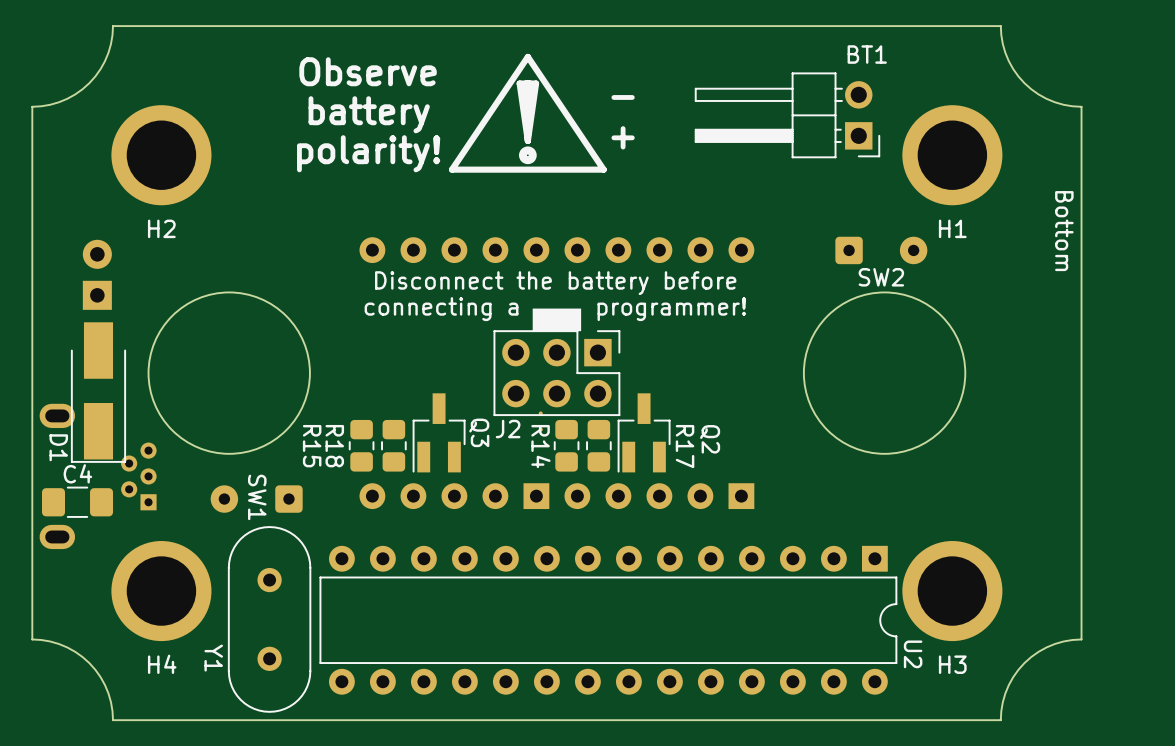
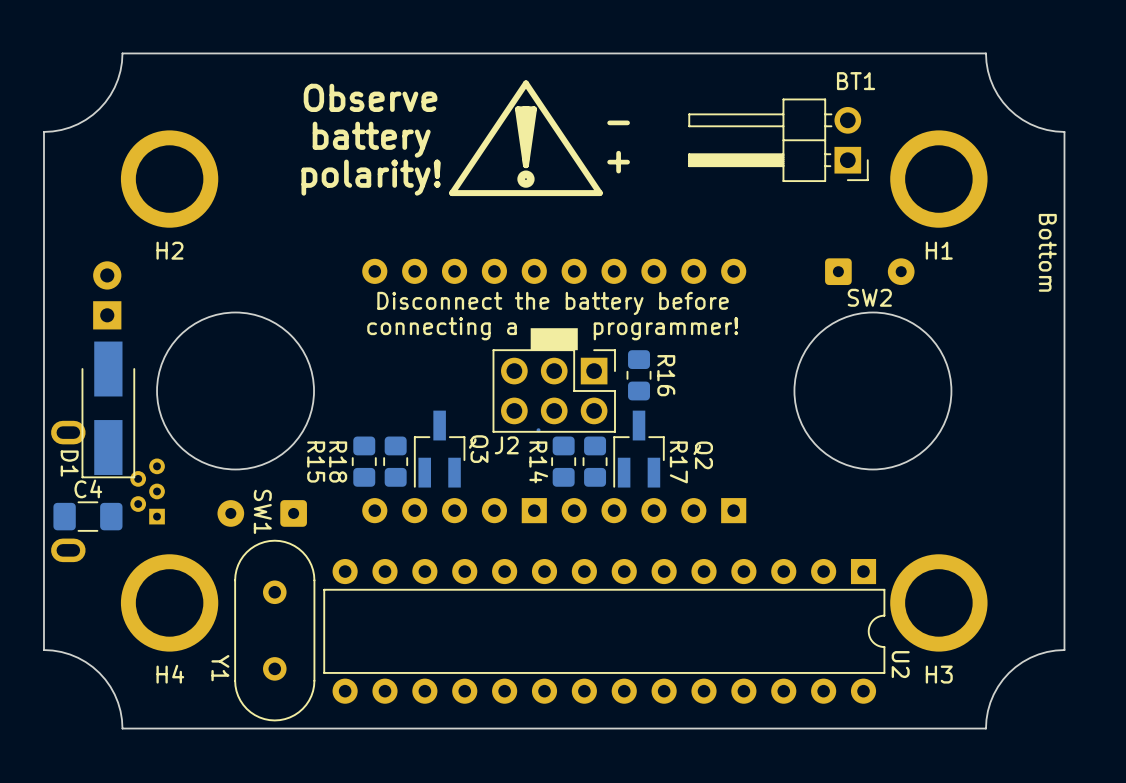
R16: none -> (639, 375)

